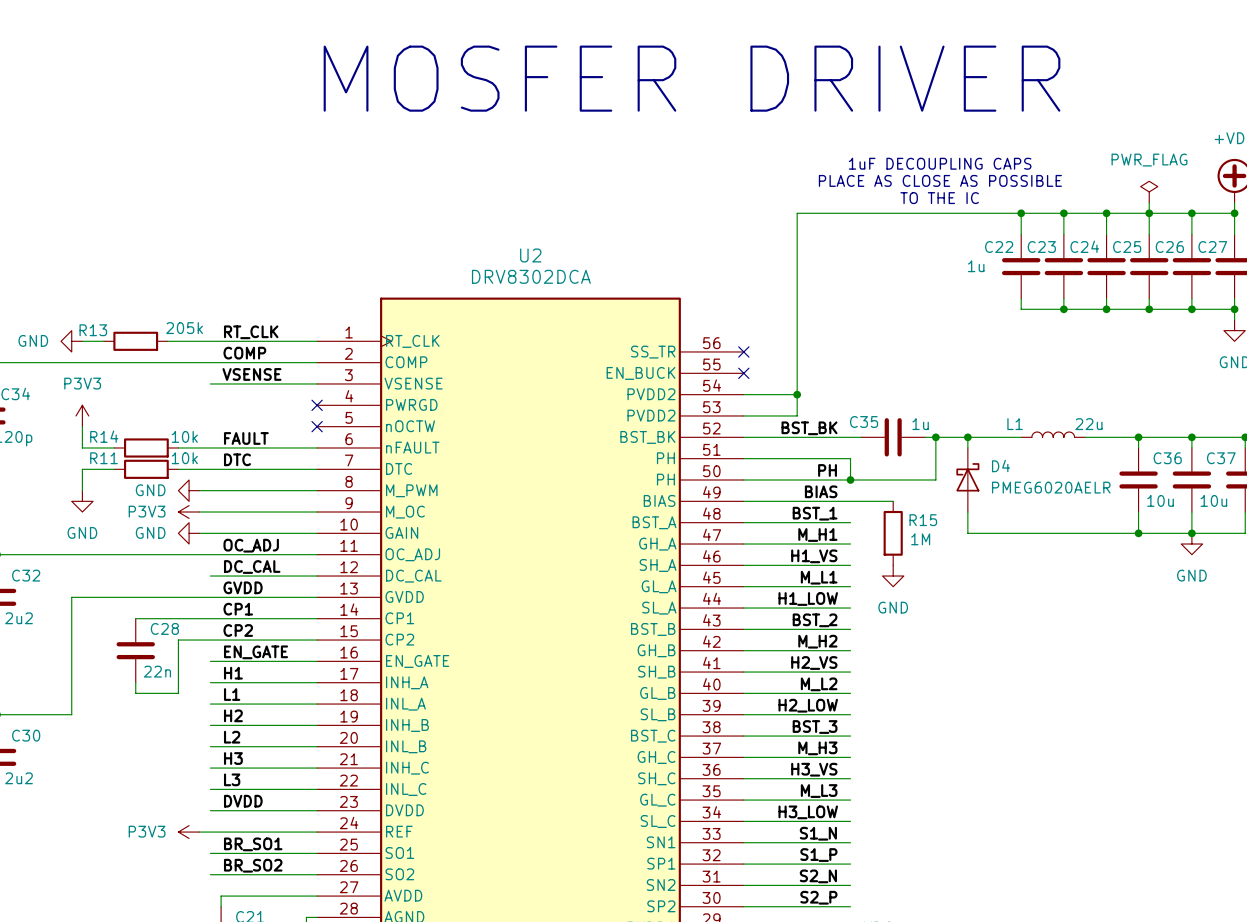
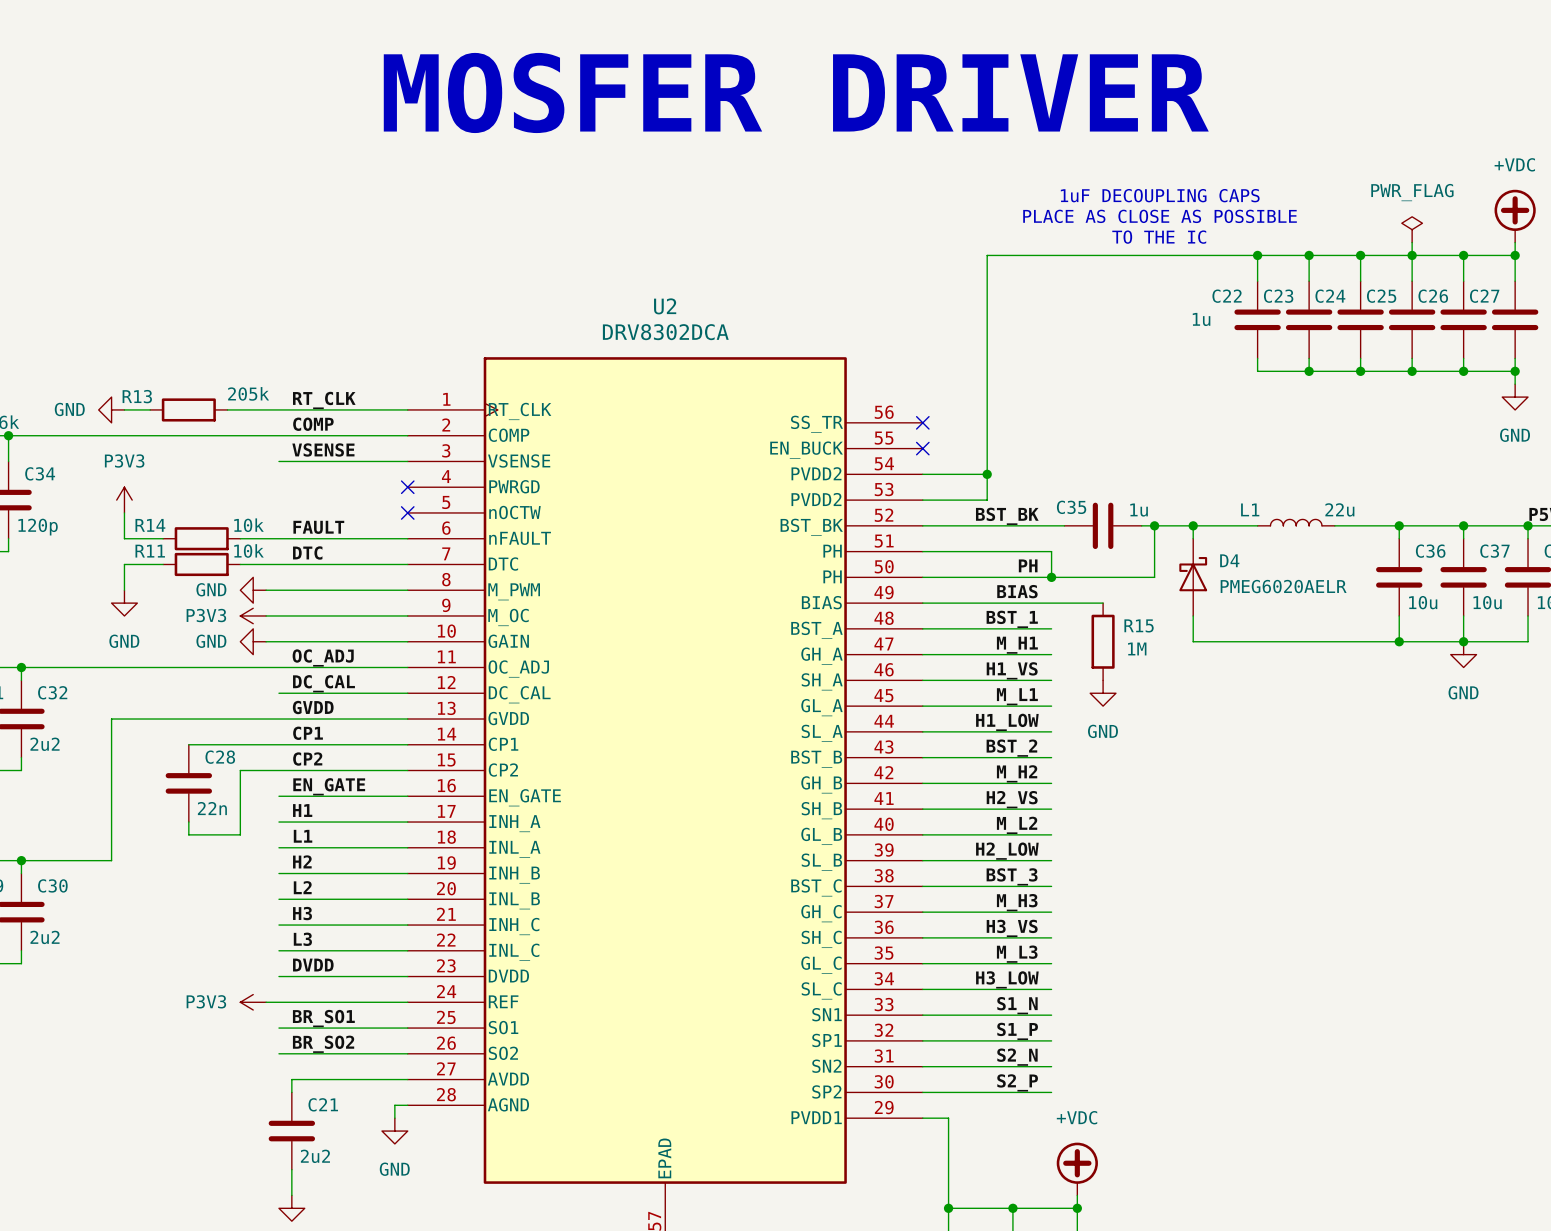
text position: MOSFER DRIVER (692, 78) -> MOSFER DRIVER (796, 92)

